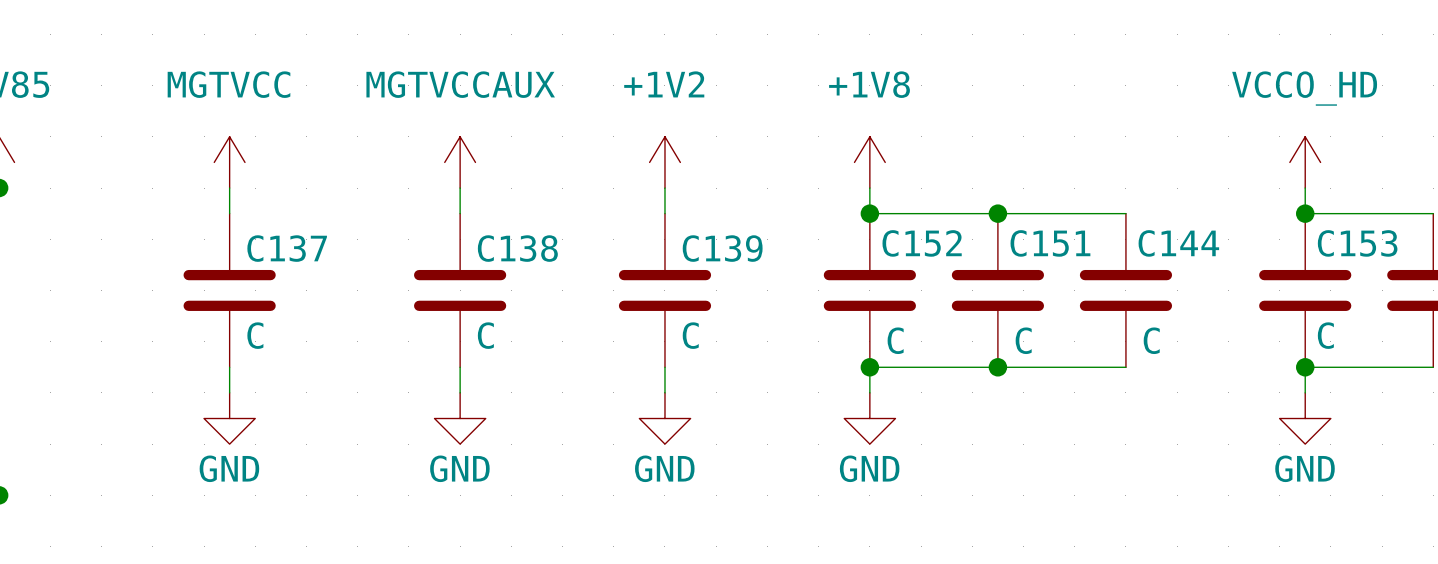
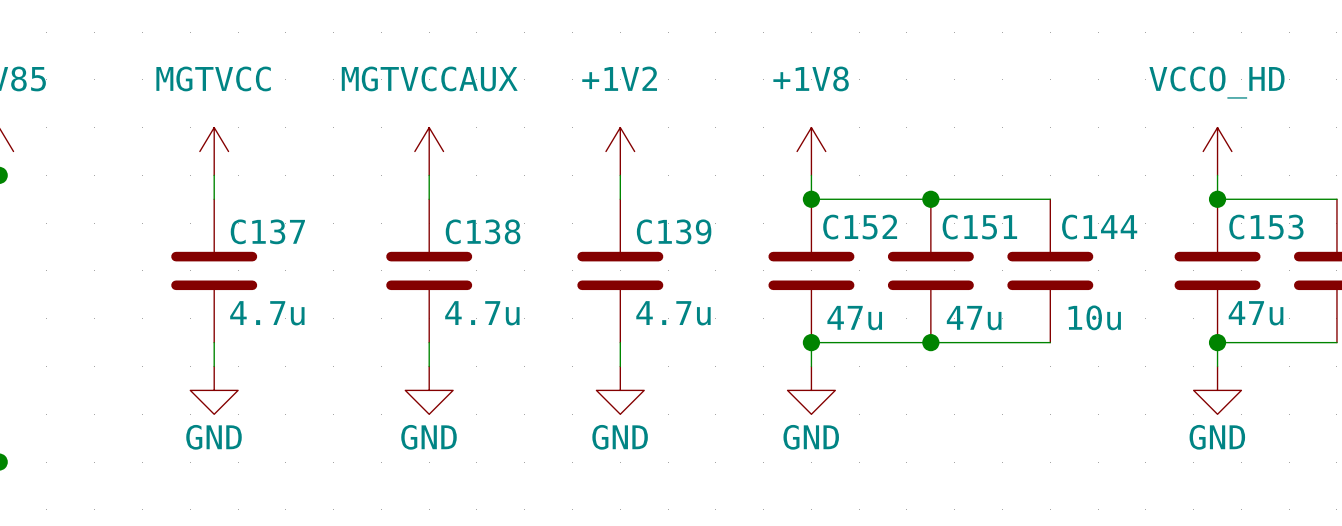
C137 value: C (255, 335) -> 4.7u (267, 313)
C138 value: C (485, 335) -> 4.7u (482, 313)
C139 value: C (690, 335) -> 4.7u (673, 313)
C153 value: C (1325, 335) -> 47u (1256, 313)
C152 value: C (895, 340) -> 47u (854, 318)
C151 value: C (1023, 340) -> 47u (974, 318)
C144 value: C (1151, 340) -> 10u (1094, 317)

